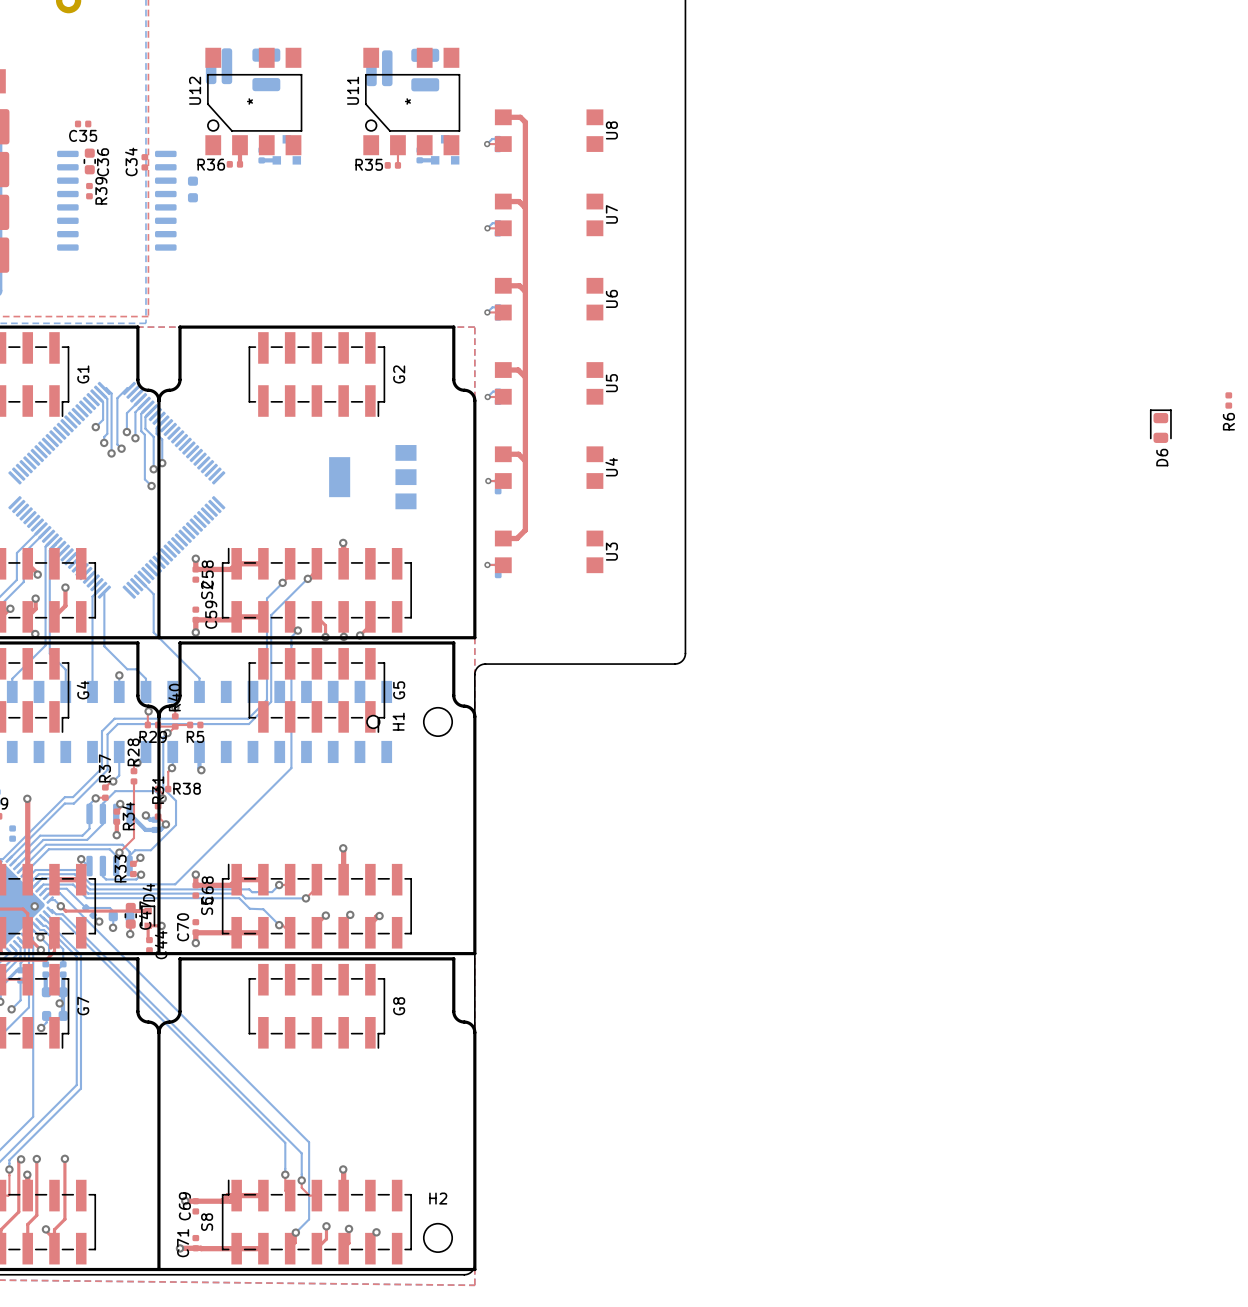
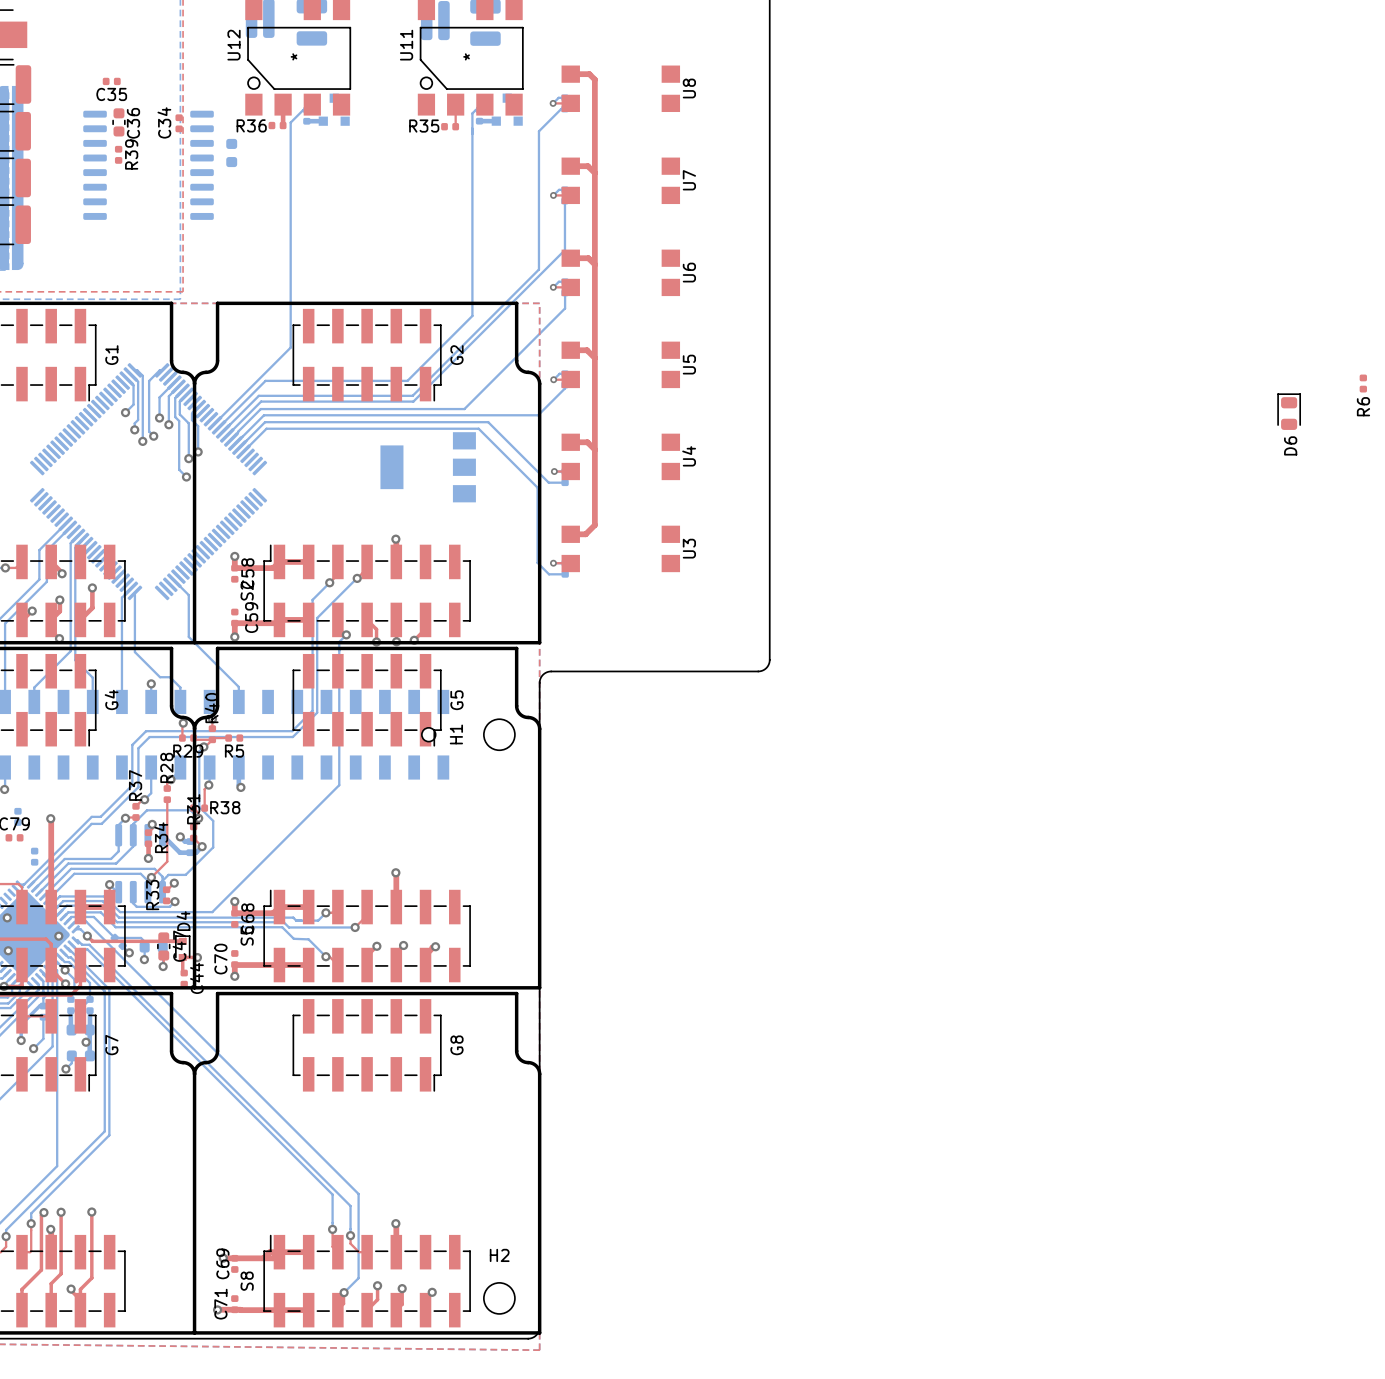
bottom track: none -> (564, 108) (561, 108) (538, 131) (538, 269) (412, 395) (258, 395) (223, 431)
bottom track: none -> (306, 110) (303, 110) (290, 122) (290, 347) (215, 423)
bottom track: none -> (479, 109) (475, 109) (472, 113) (472, 315) (407, 380) (265, 380) (219, 427)
bottom track: none -> (564, 201) (564, 250) (413, 401) (261, 401) (227, 435)
bottom track: none -> (565, 292) (565, 308) (464, 409) (260, 409) (231, 439)
bottom track: none -> (565, 384) (565, 388) (538, 415) (264, 415) (235, 443)
bottom track: none -> (239, 447) (265, 422) (488, 422) (548, 482) (565, 482)
bottom track: none -> (243, 451) (266, 428) (478, 428) (537, 487) (537, 562) (549, 574) (565, 574)

